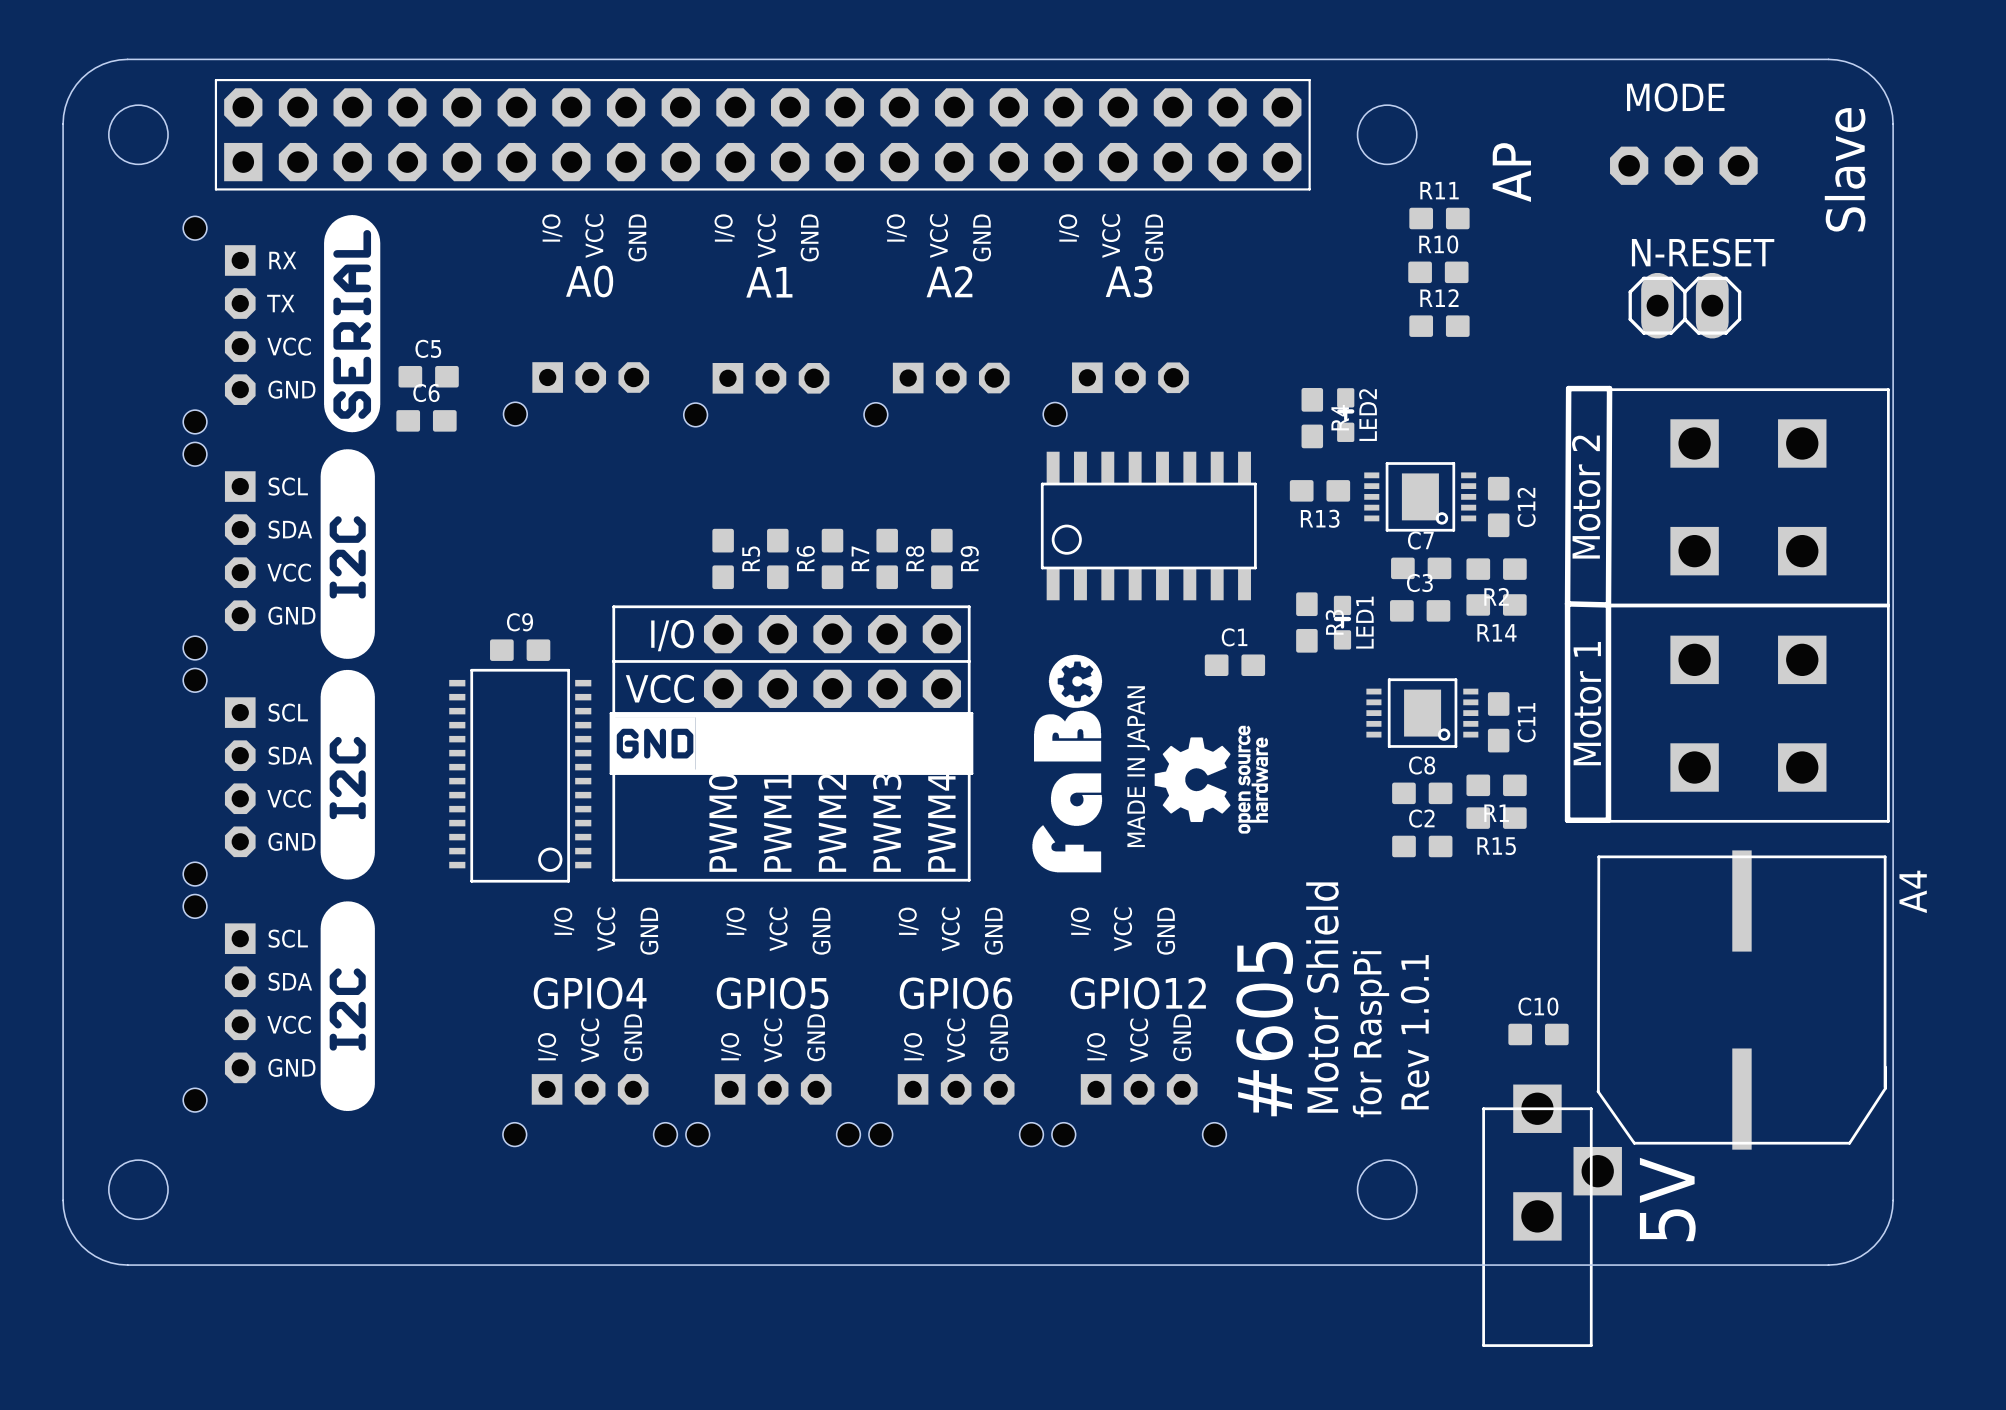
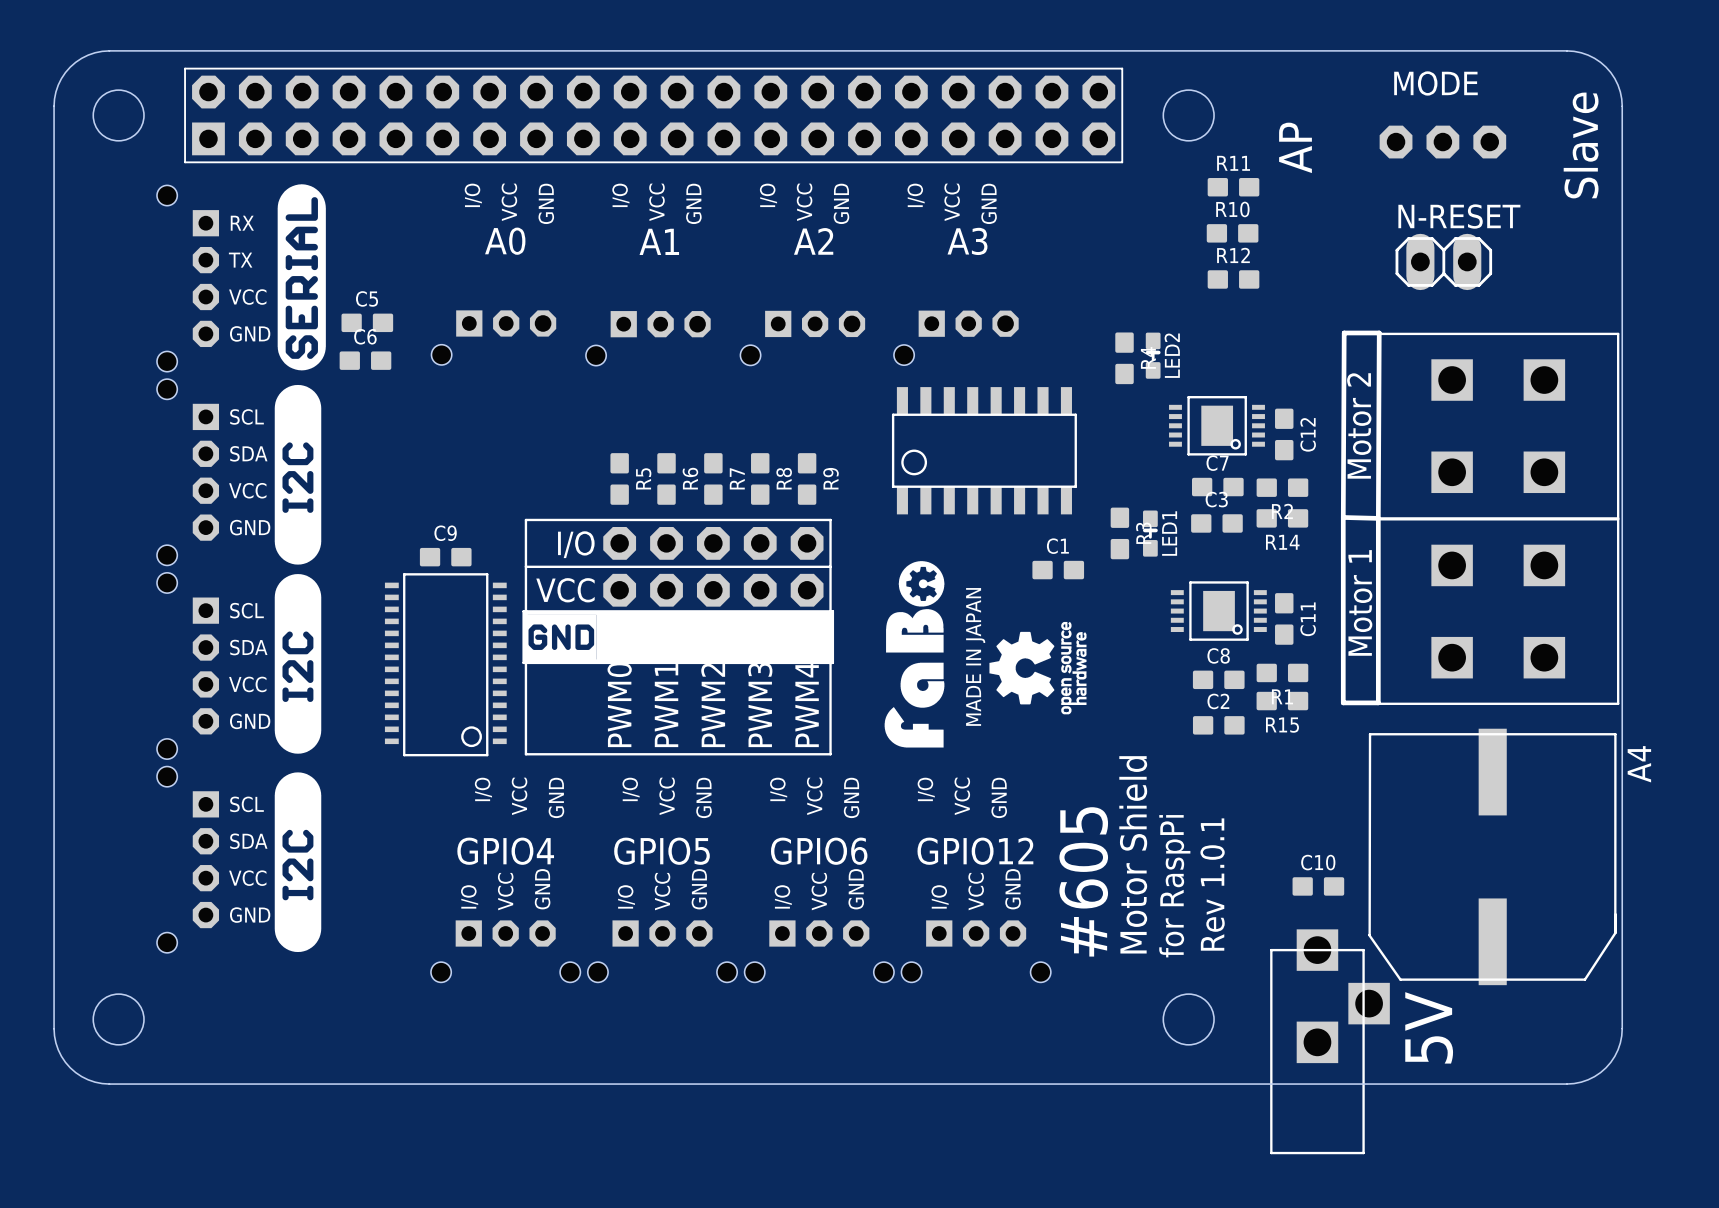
R13: (1319, 490) -> none
A4 footprint: [1596, 850, 1887, 1150] -> [1368, 728, 1617, 986]

